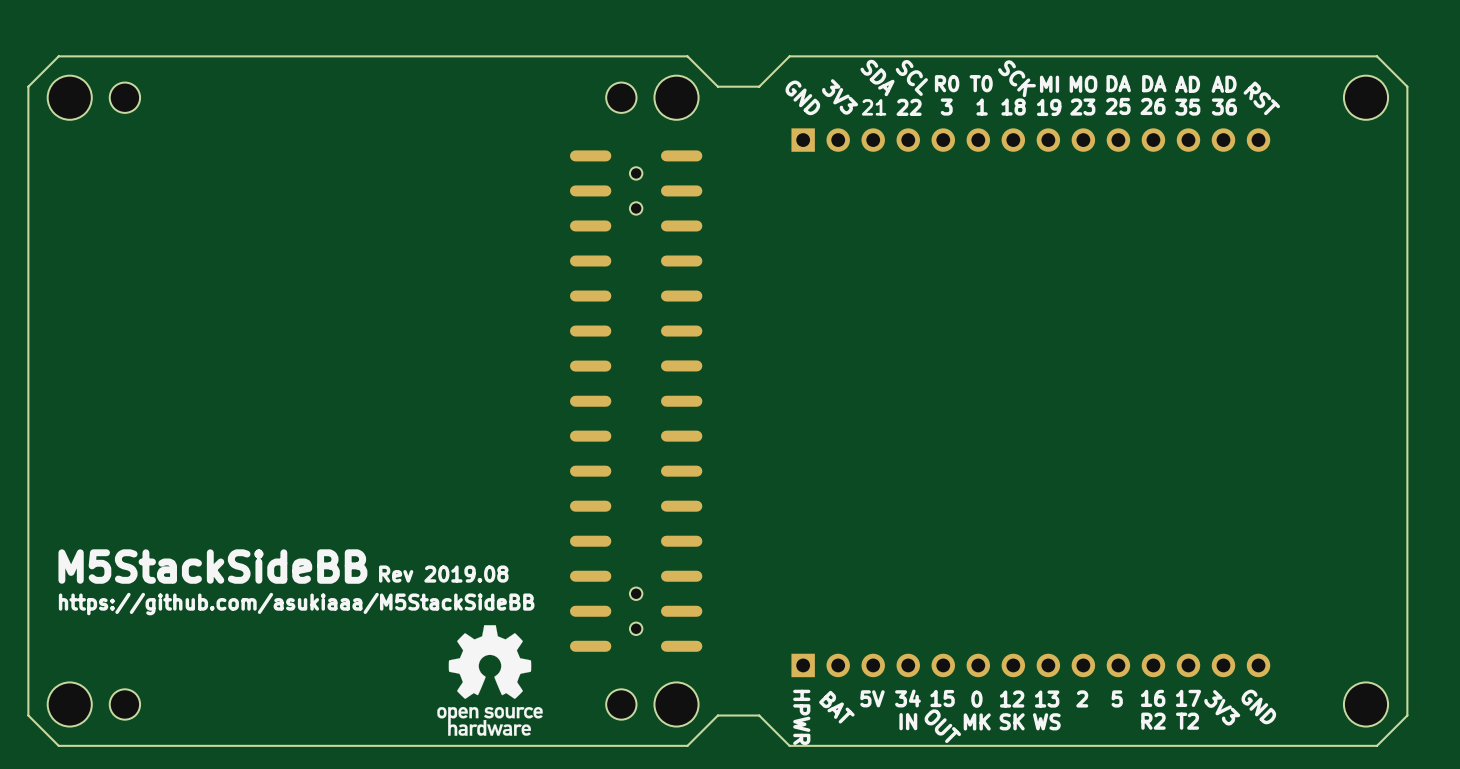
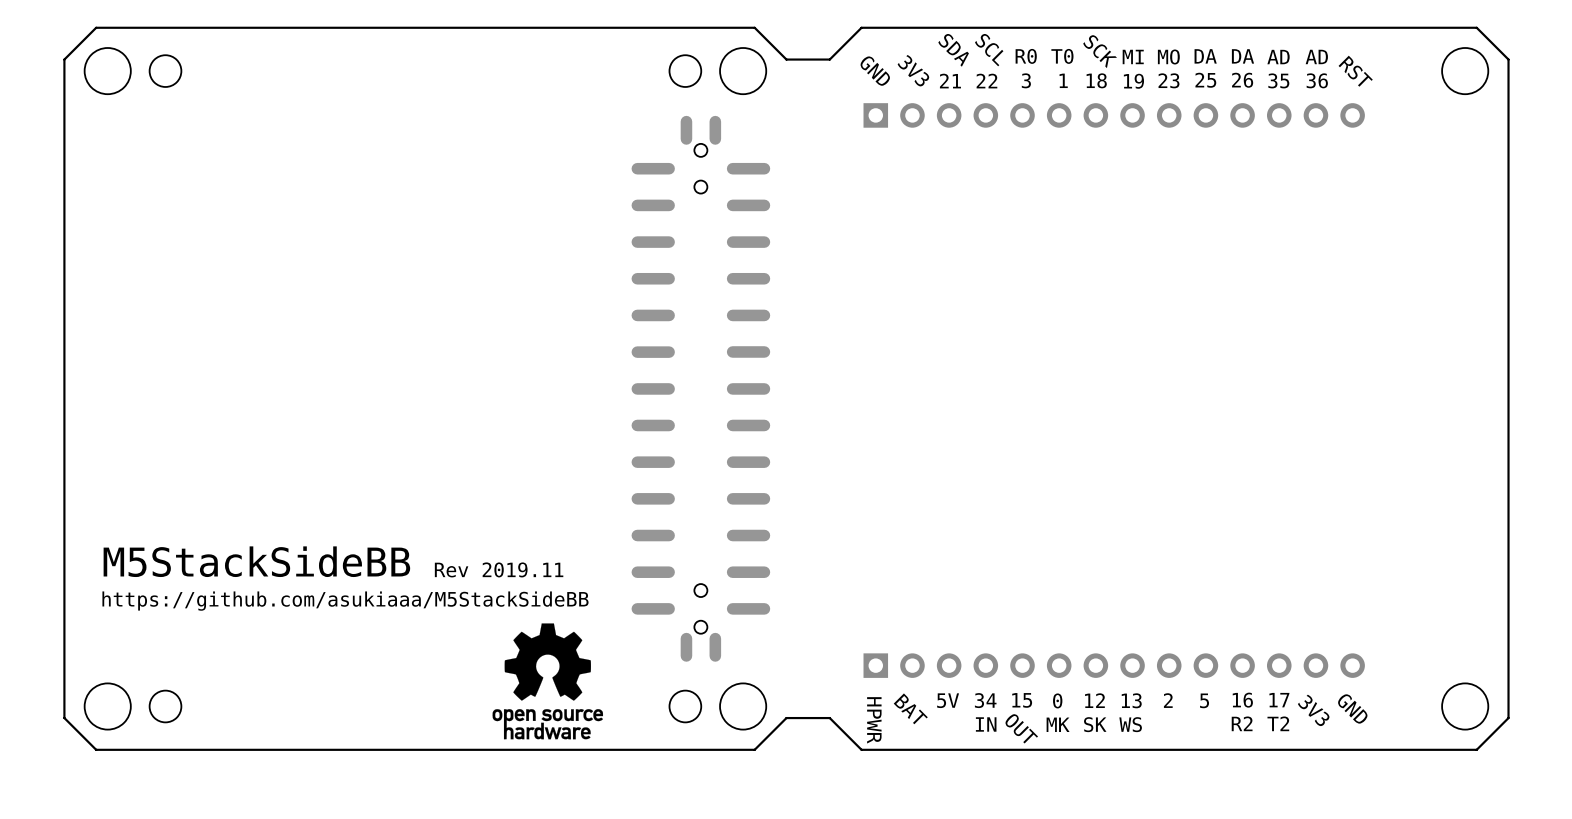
part footprint: [569, 150, 703, 652] -> [631, 115, 771, 662]
text: Rev 2019.08 (443, 574) -> Rev 2019.11 (499, 569)

